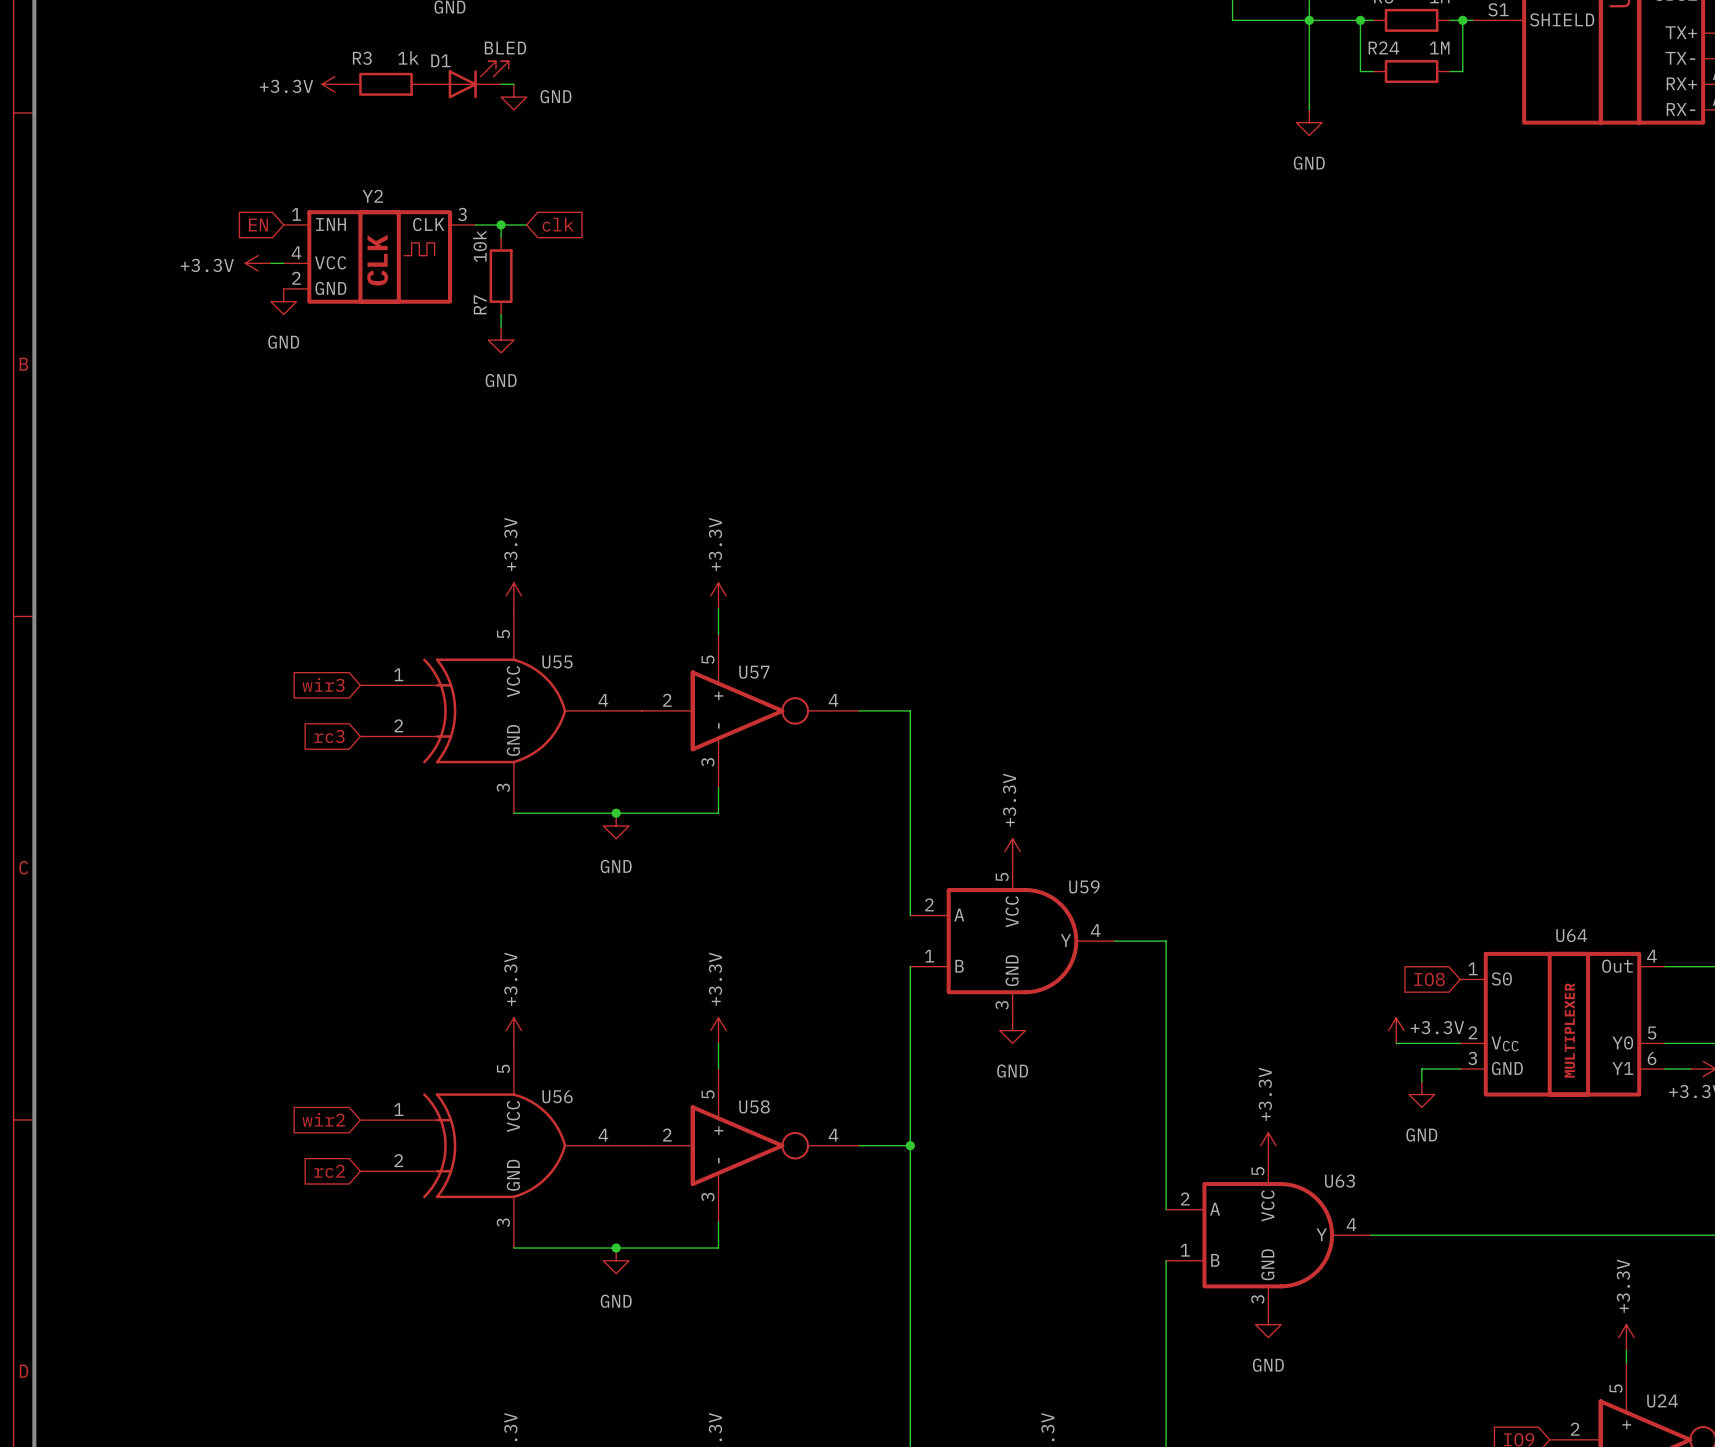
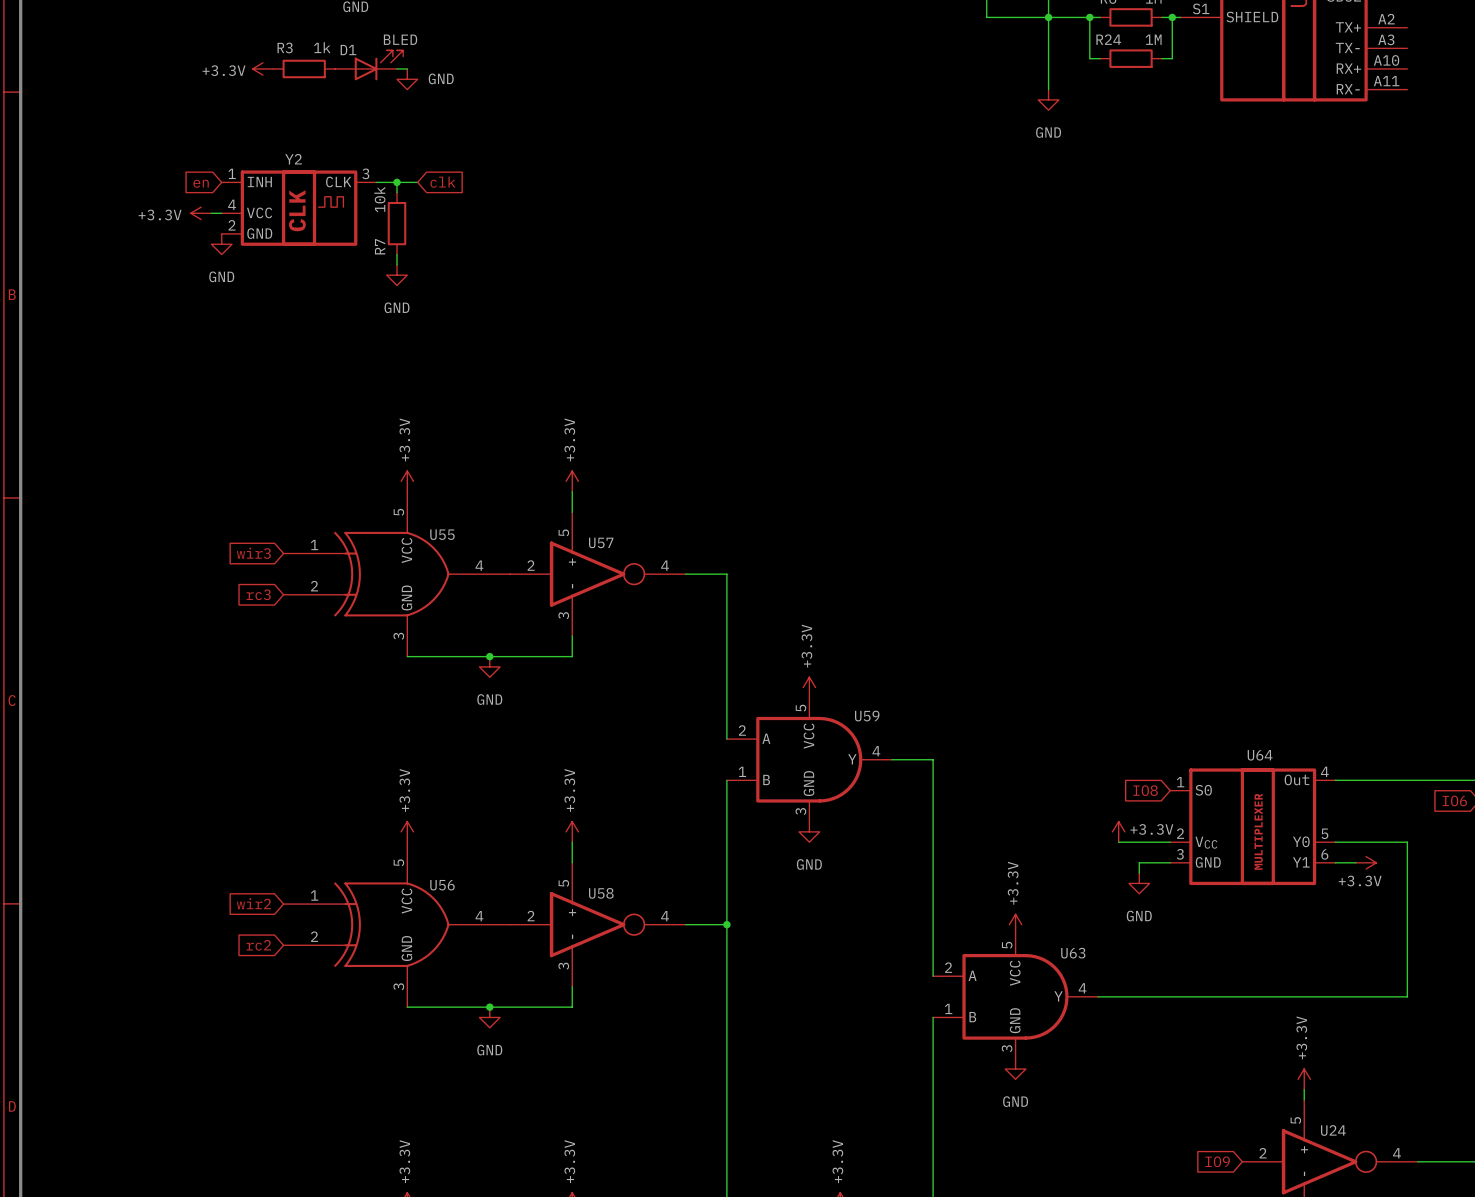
global label: EN (258, 224) -> en (201, 183)

